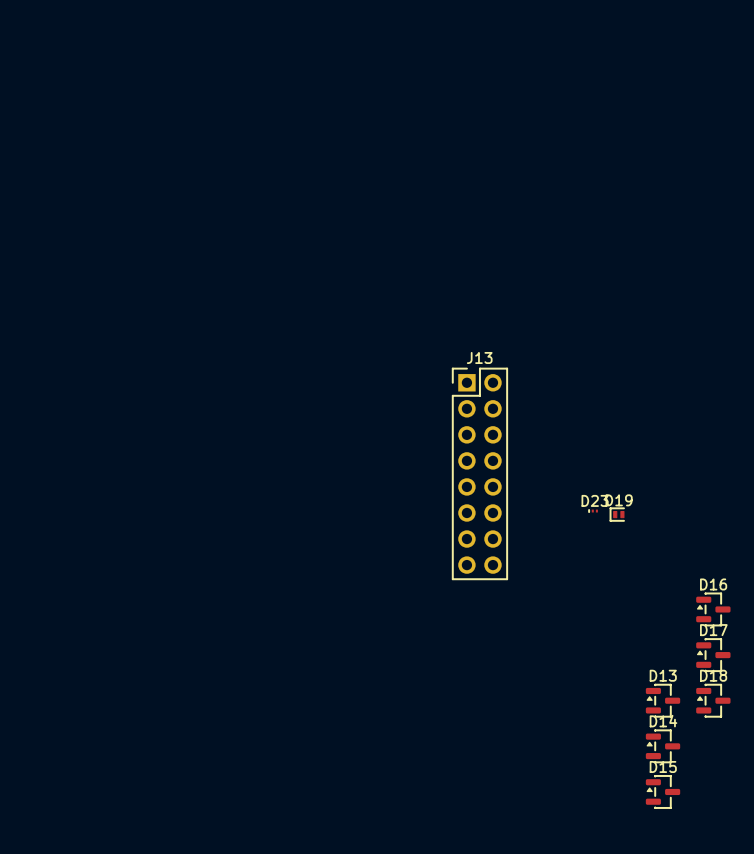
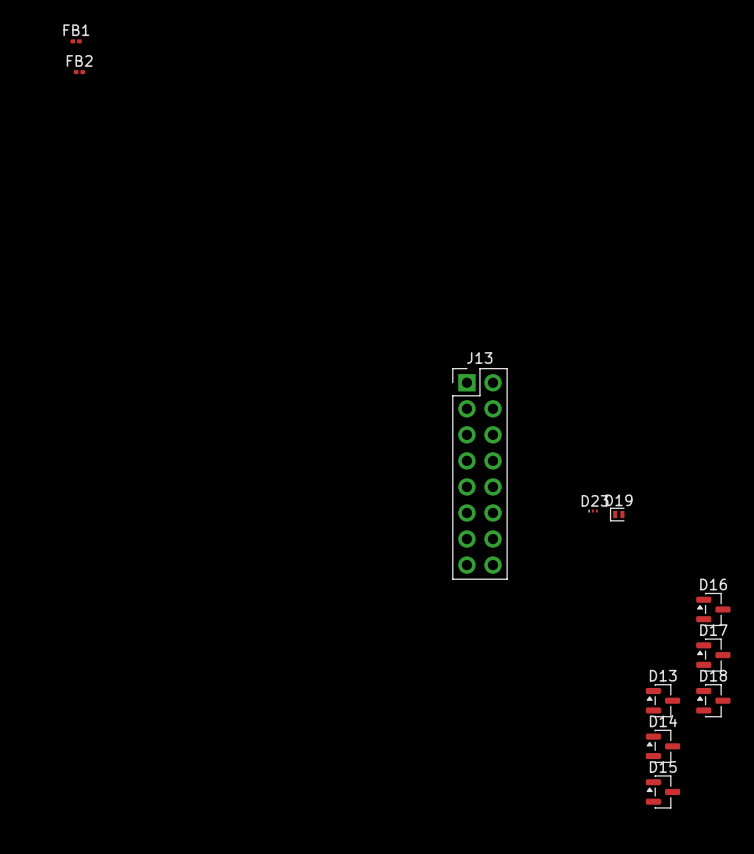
FB1: none -> (76, 41)
FB2: none -> (79, 72)

